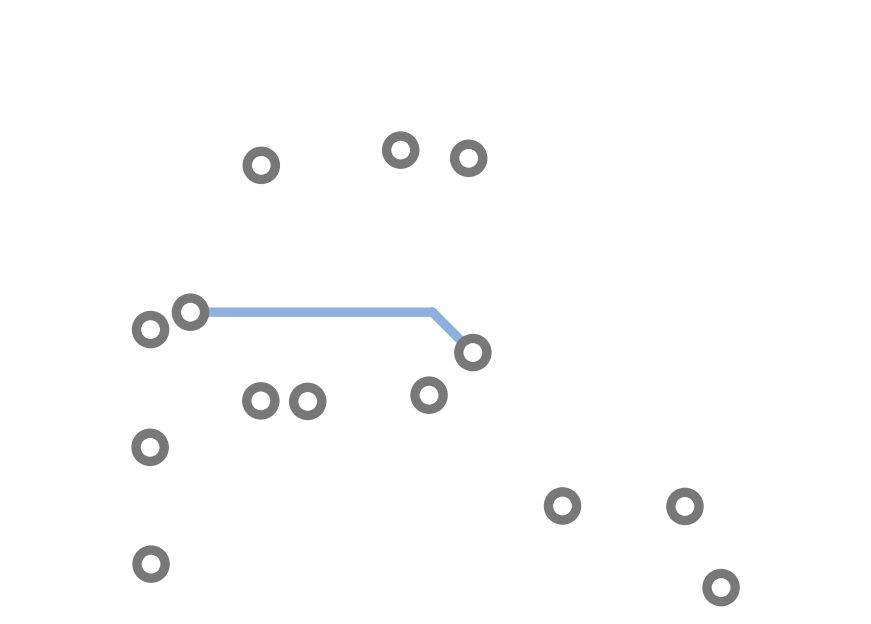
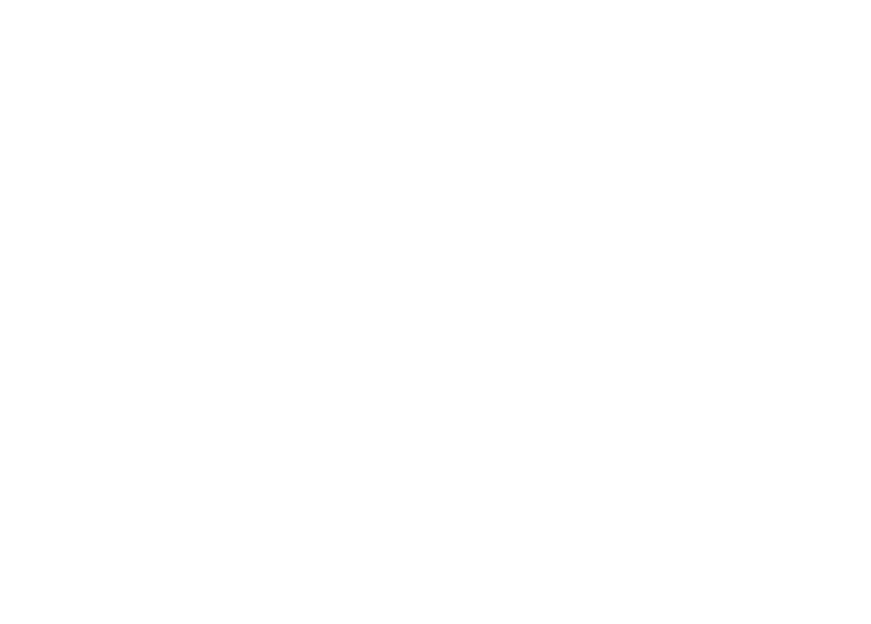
via: (400, 150) -> none
via: (468, 158) -> none
via: (261, 165) -> none
track: (190, 312) (432, 312) (472, 352) -> none
via: (190, 312) -> none
via: (150, 329) -> none
via: (472, 352) -> none
via: (429, 395) -> none
via: (260, 400) -> none
via: (307, 401) -> none
via: (150, 447) -> none
via: (562, 505) -> none
via: (684, 506) -> none
via: (151, 564) -> none
via: (721, 587) -> none

